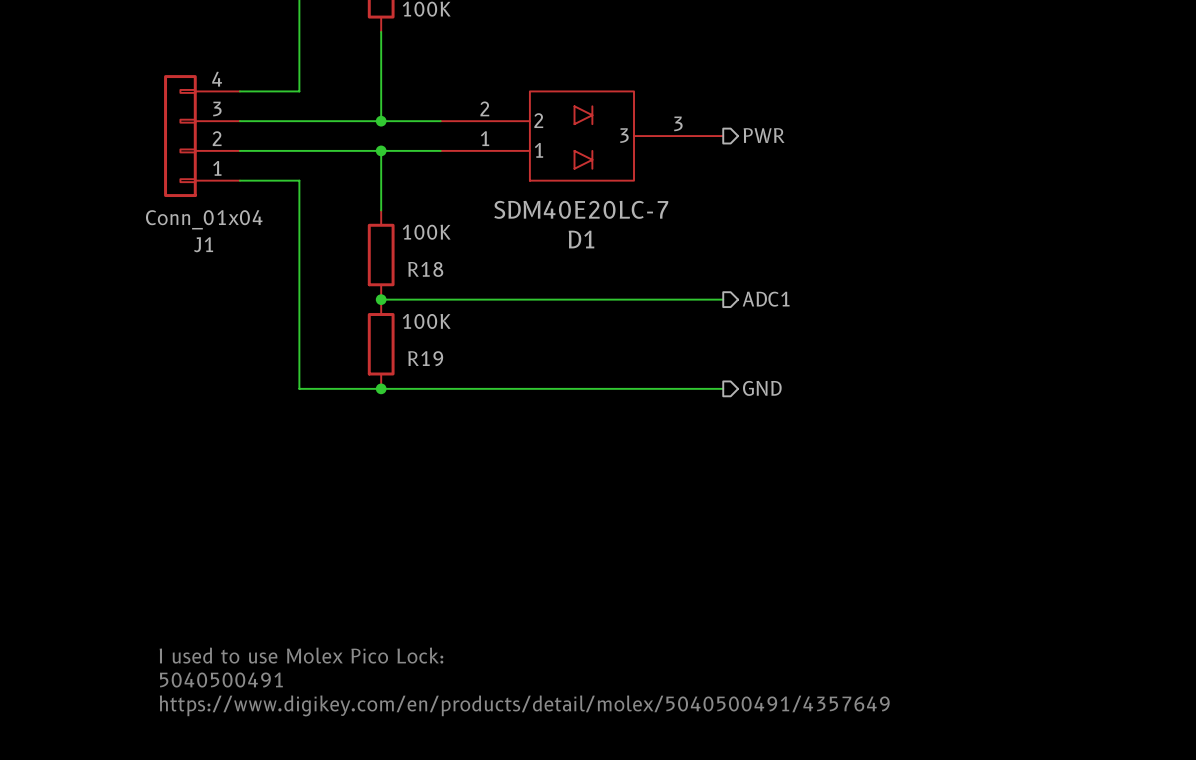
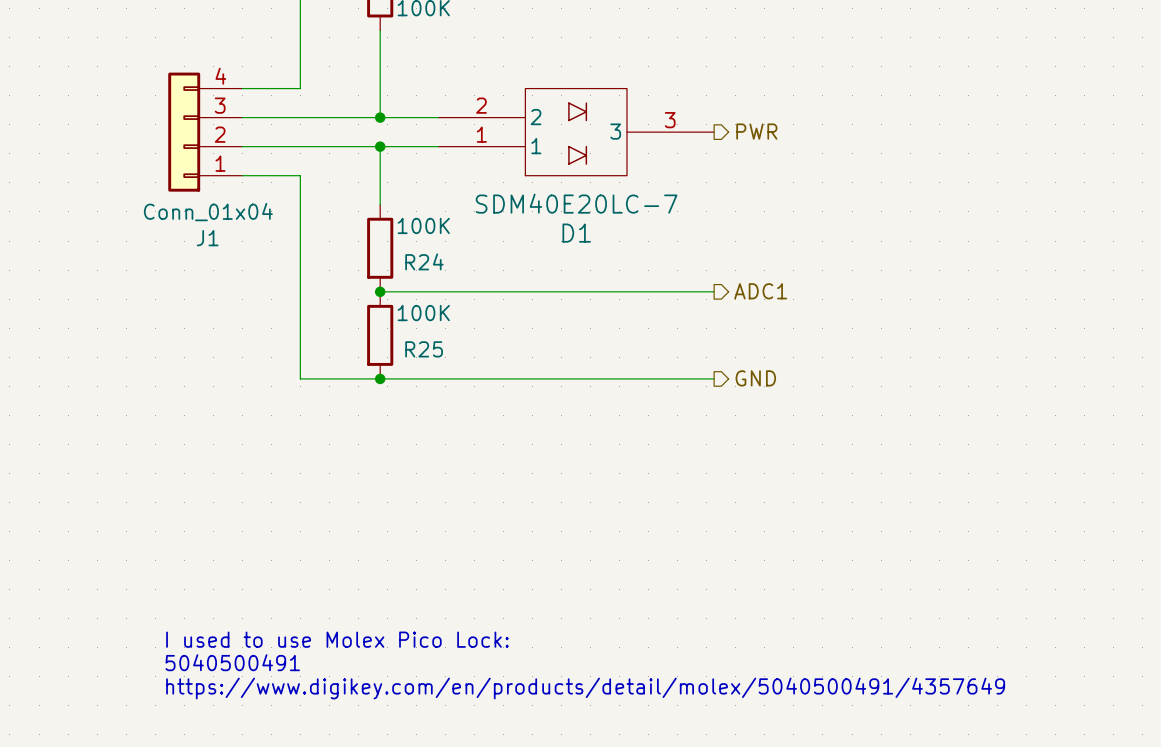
R18 name: R18 (425, 269) -> R24 (424, 261)
R19 name: R19 (425, 358) -> R25 (424, 349)

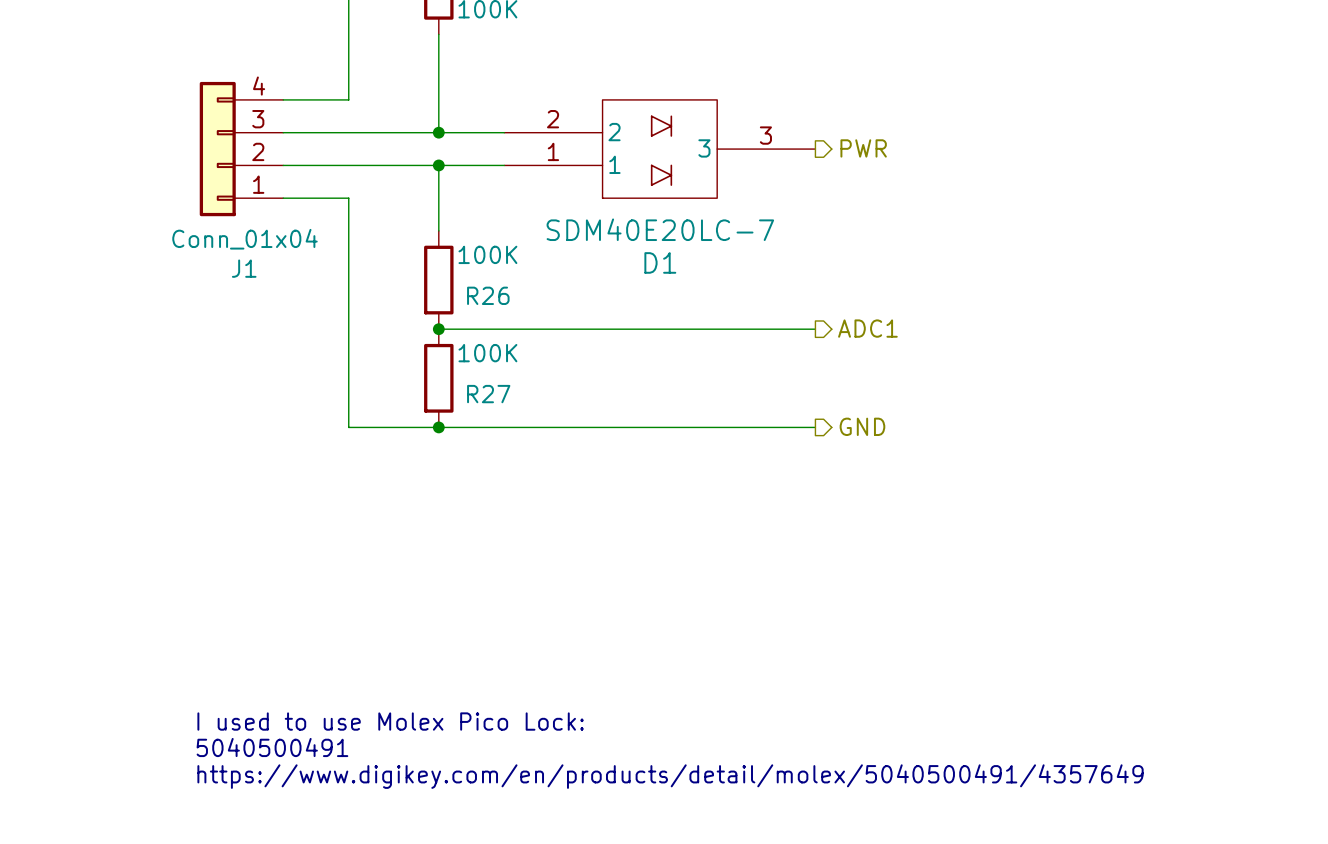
R24 name: R24 (424, 261) -> R26 (488, 295)
R25 name: R25 (424, 349) -> R27 (488, 394)

